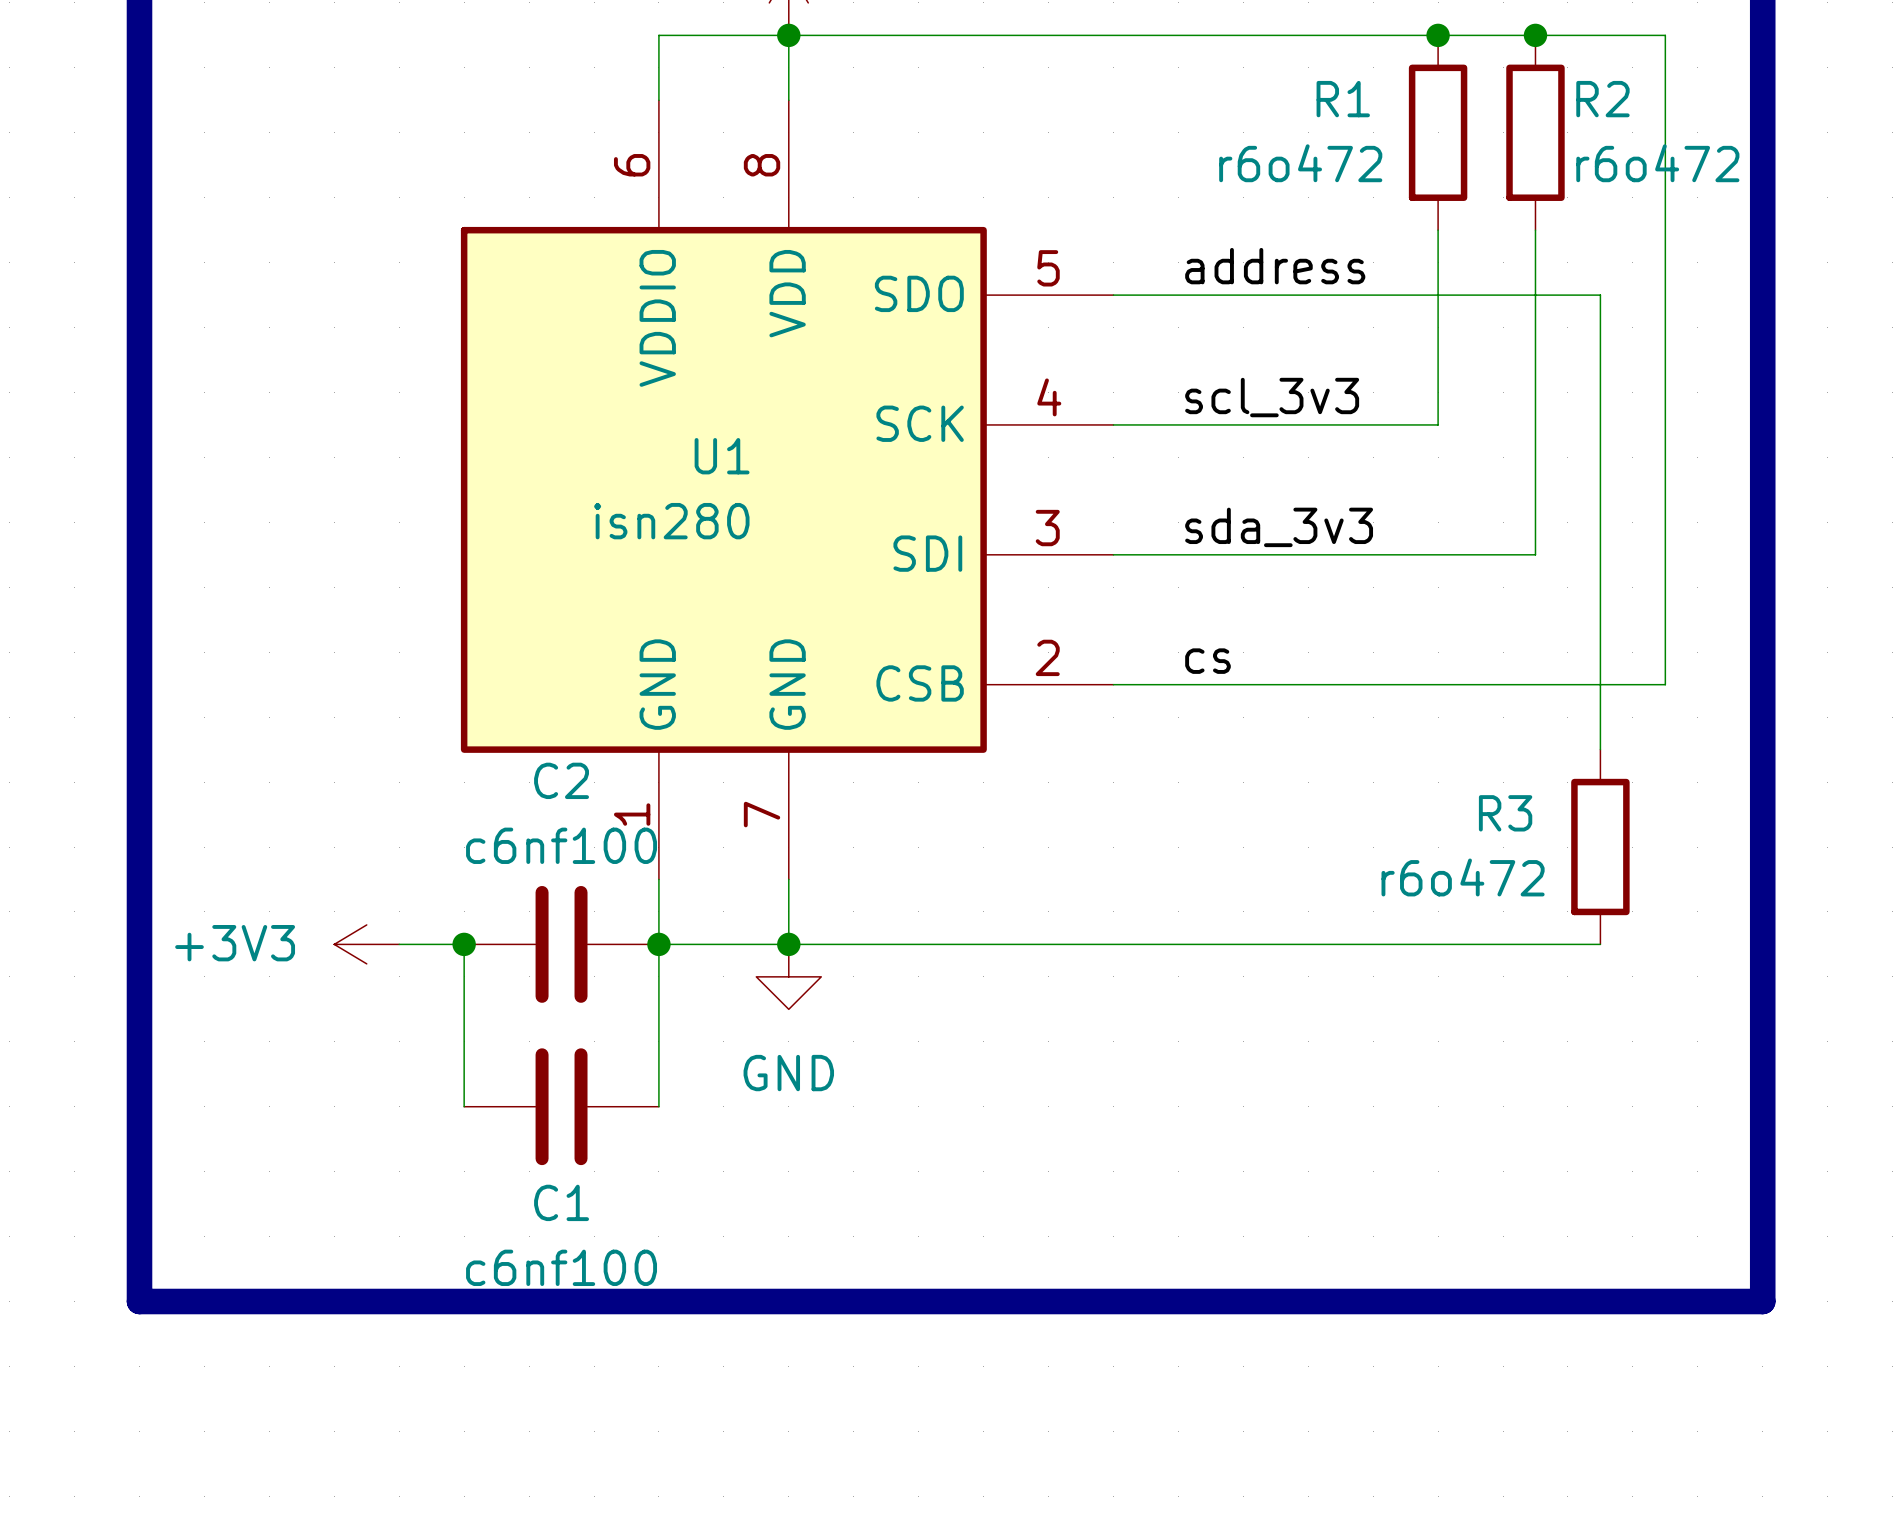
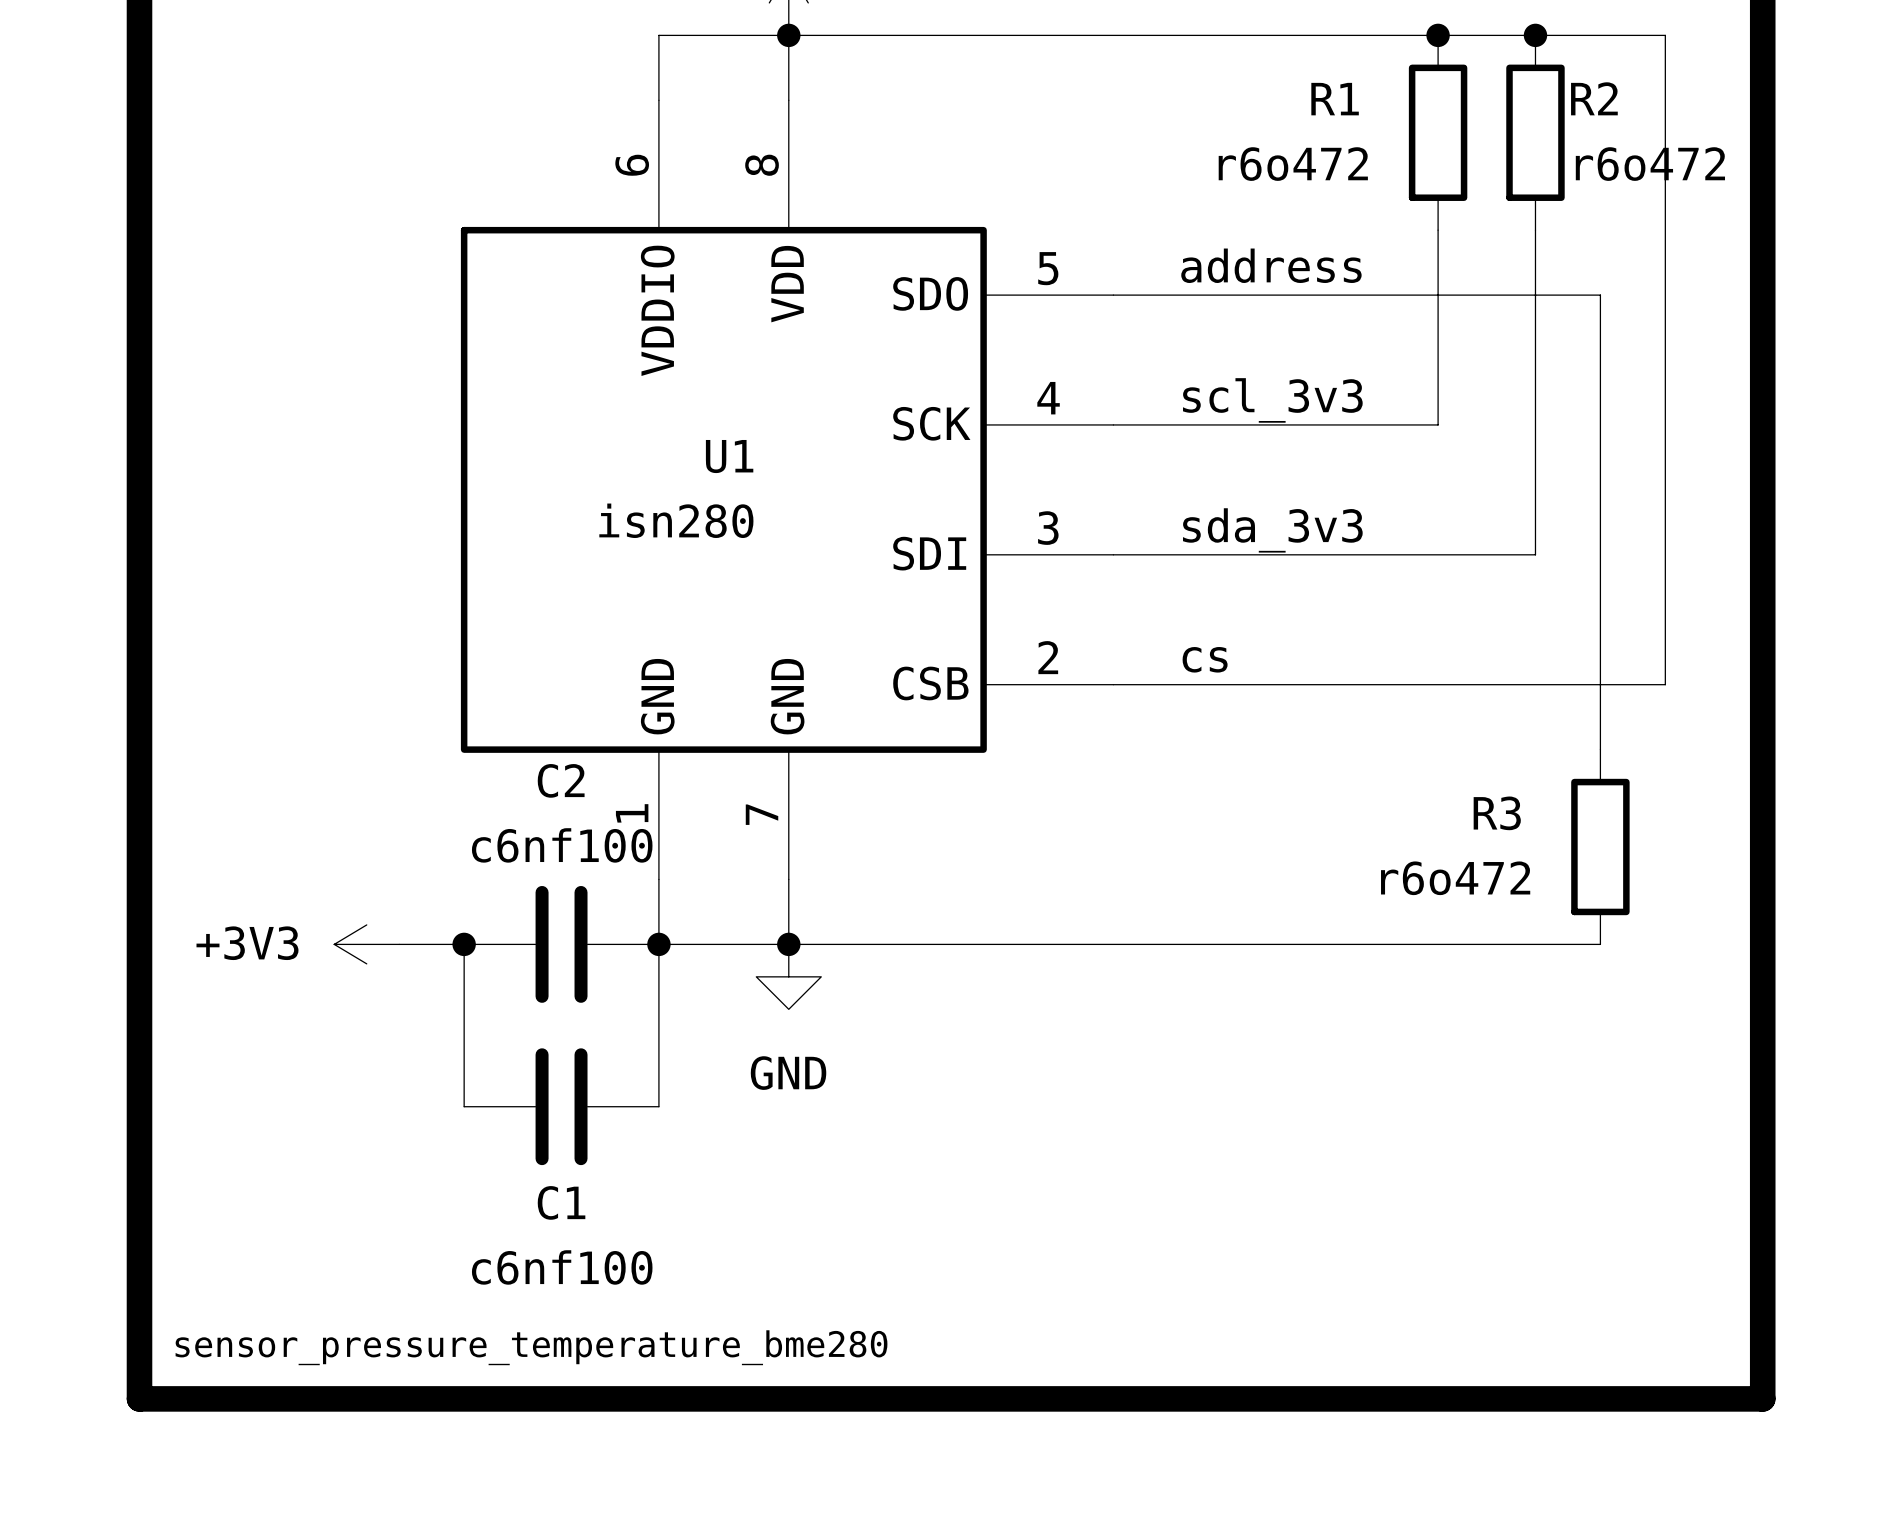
line: (139, 1301) (1762, 1301) -> (139, 1301) (139, 1398) (1762, 1398) (1762, 1301)
text: none -> sensor_pressure_temperature_bme280 (531, 1347)

